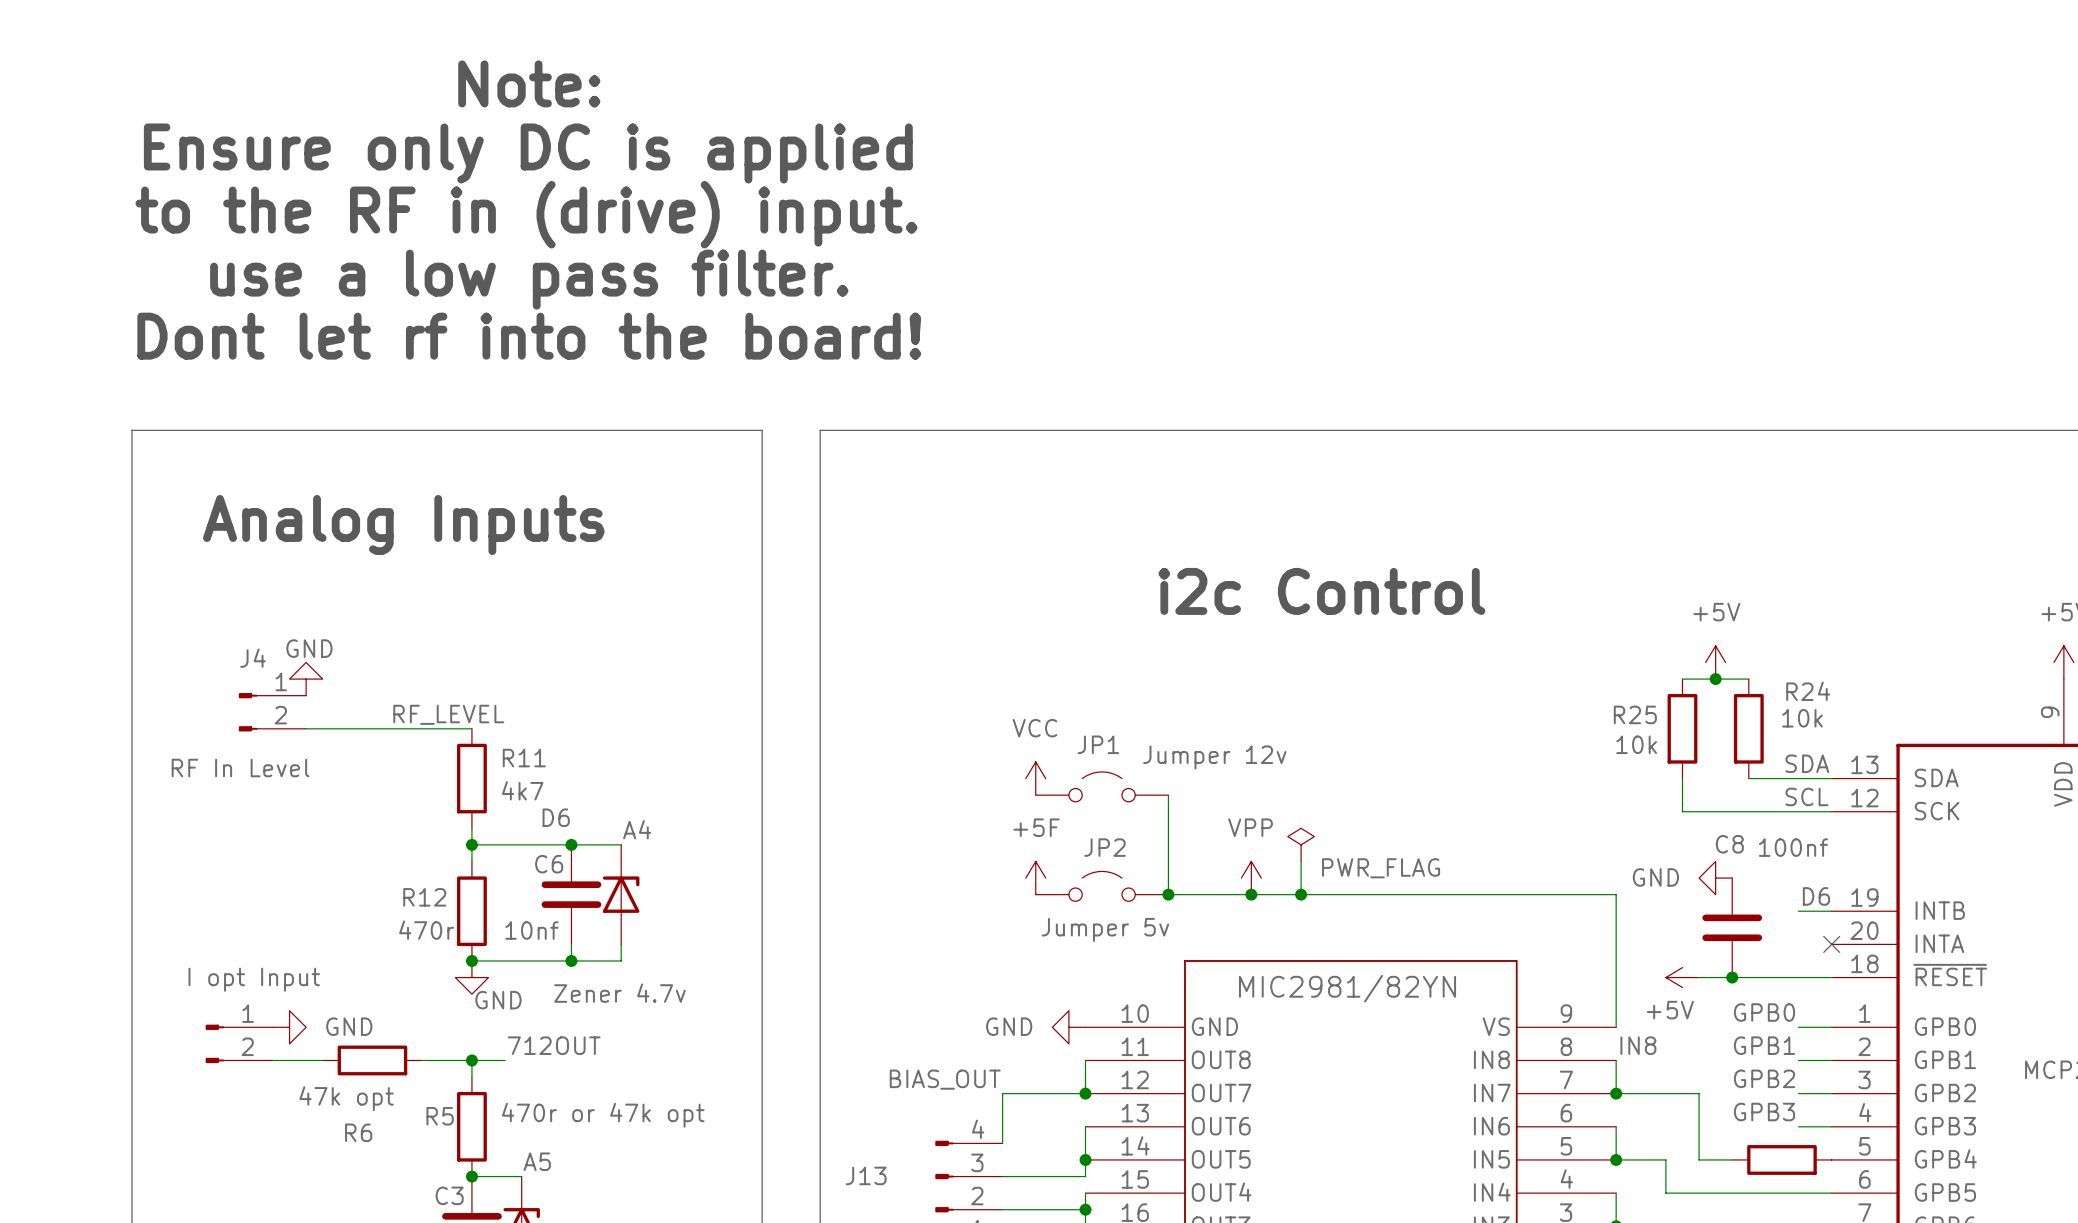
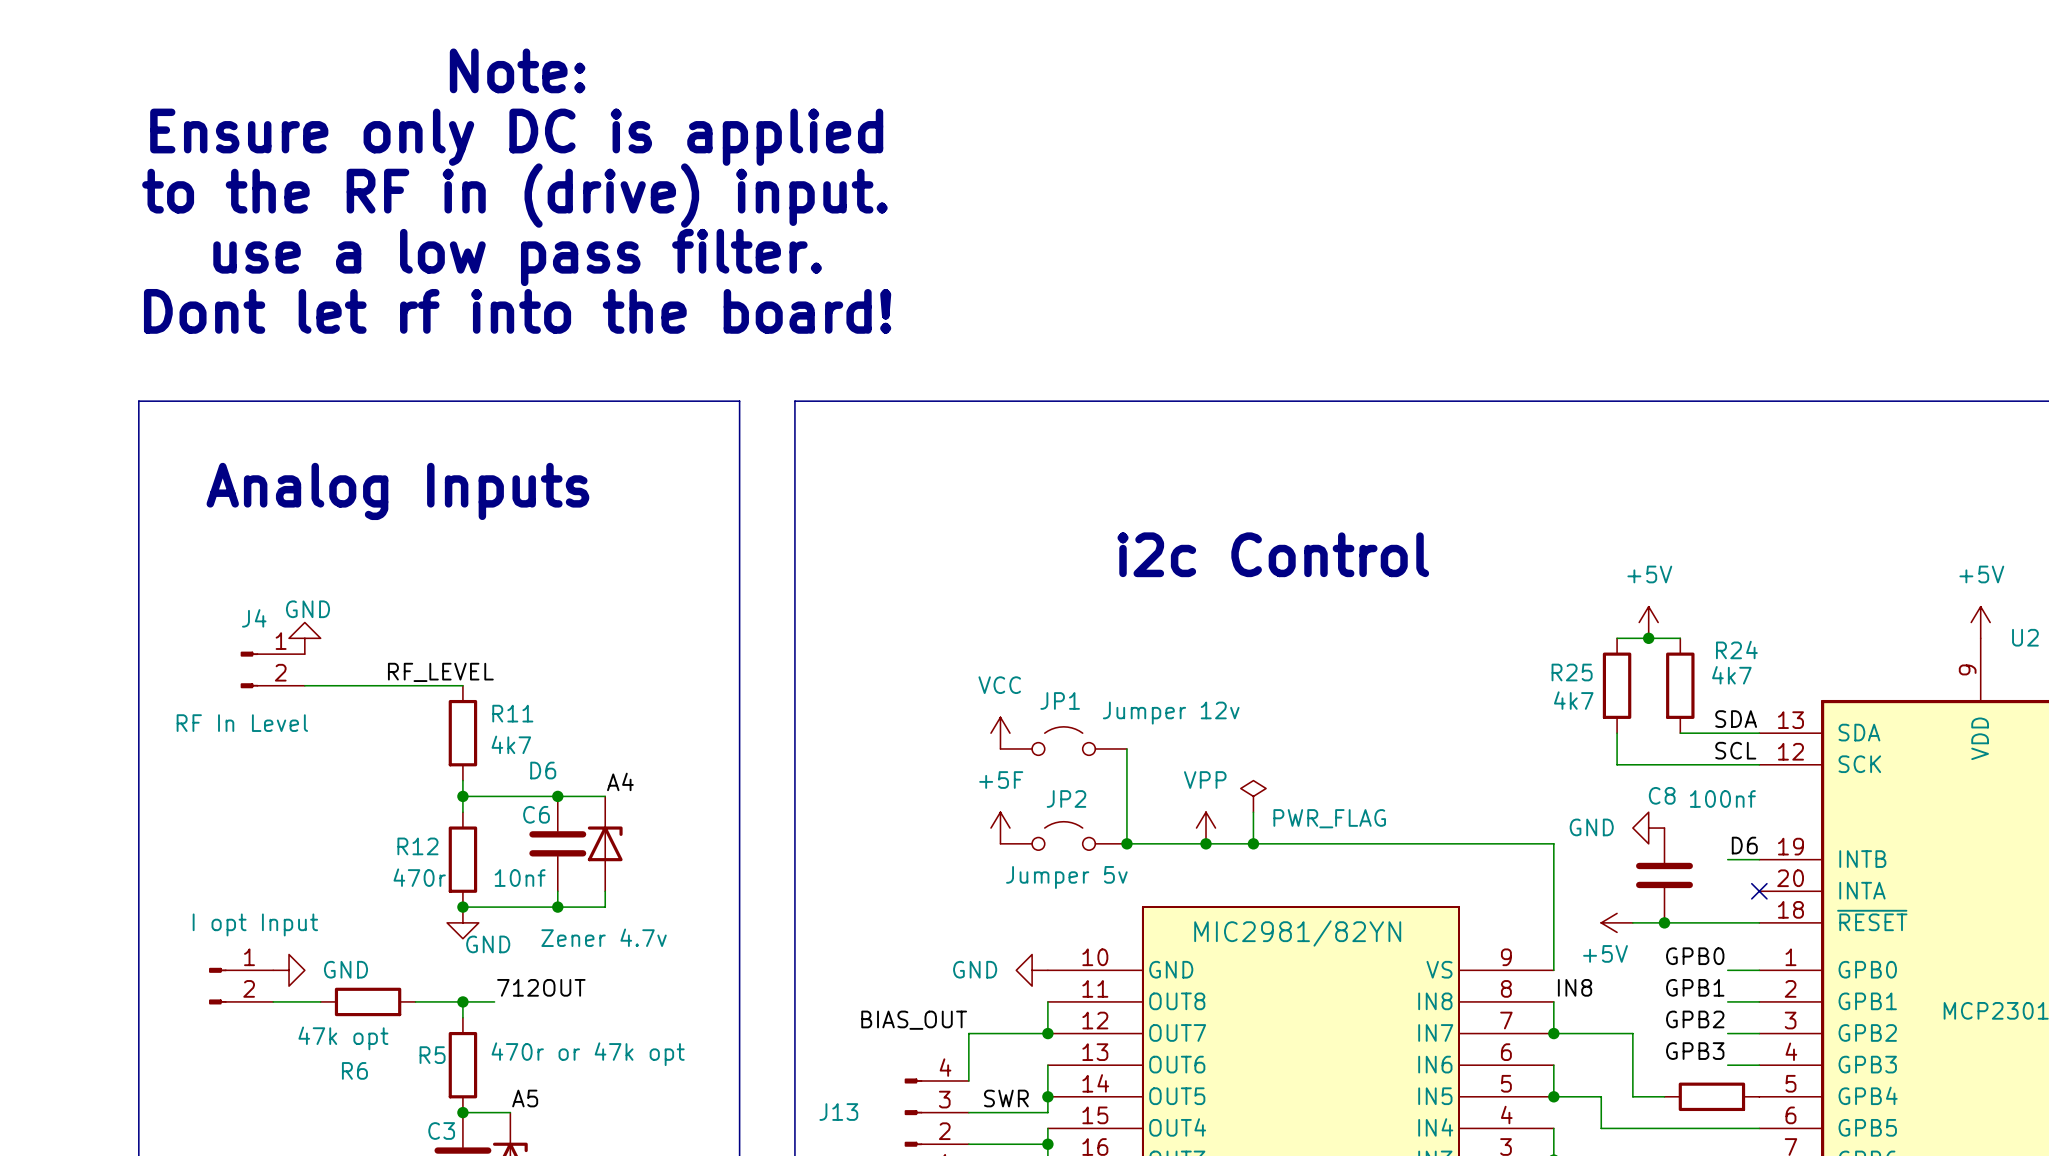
R24 value: 10k (1802, 718) -> 4k7 (1731, 675)
R25 value: 10k (1636, 744) -> 4k7 (1573, 700)
label: none -> SWR (1006, 1098)

